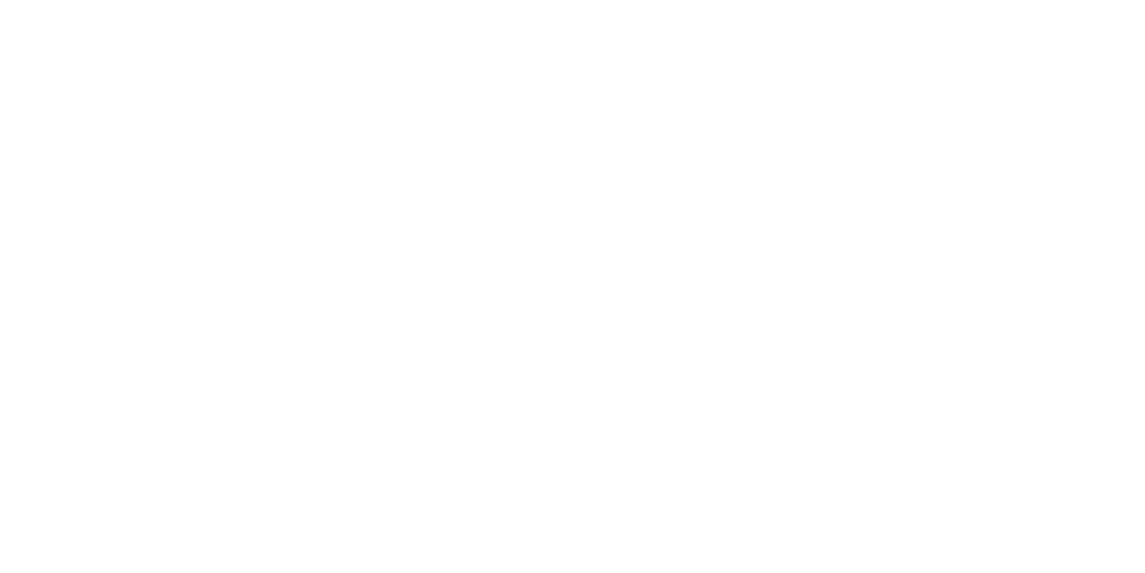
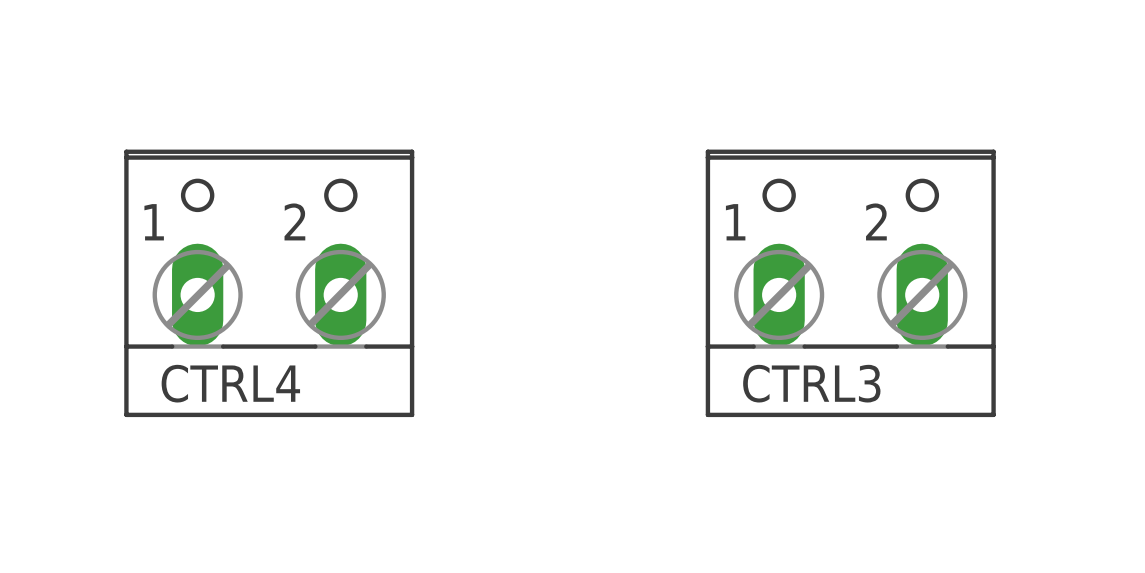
CTRL4: none -> (269, 283)
CTRL3: none -> (850, 283)

